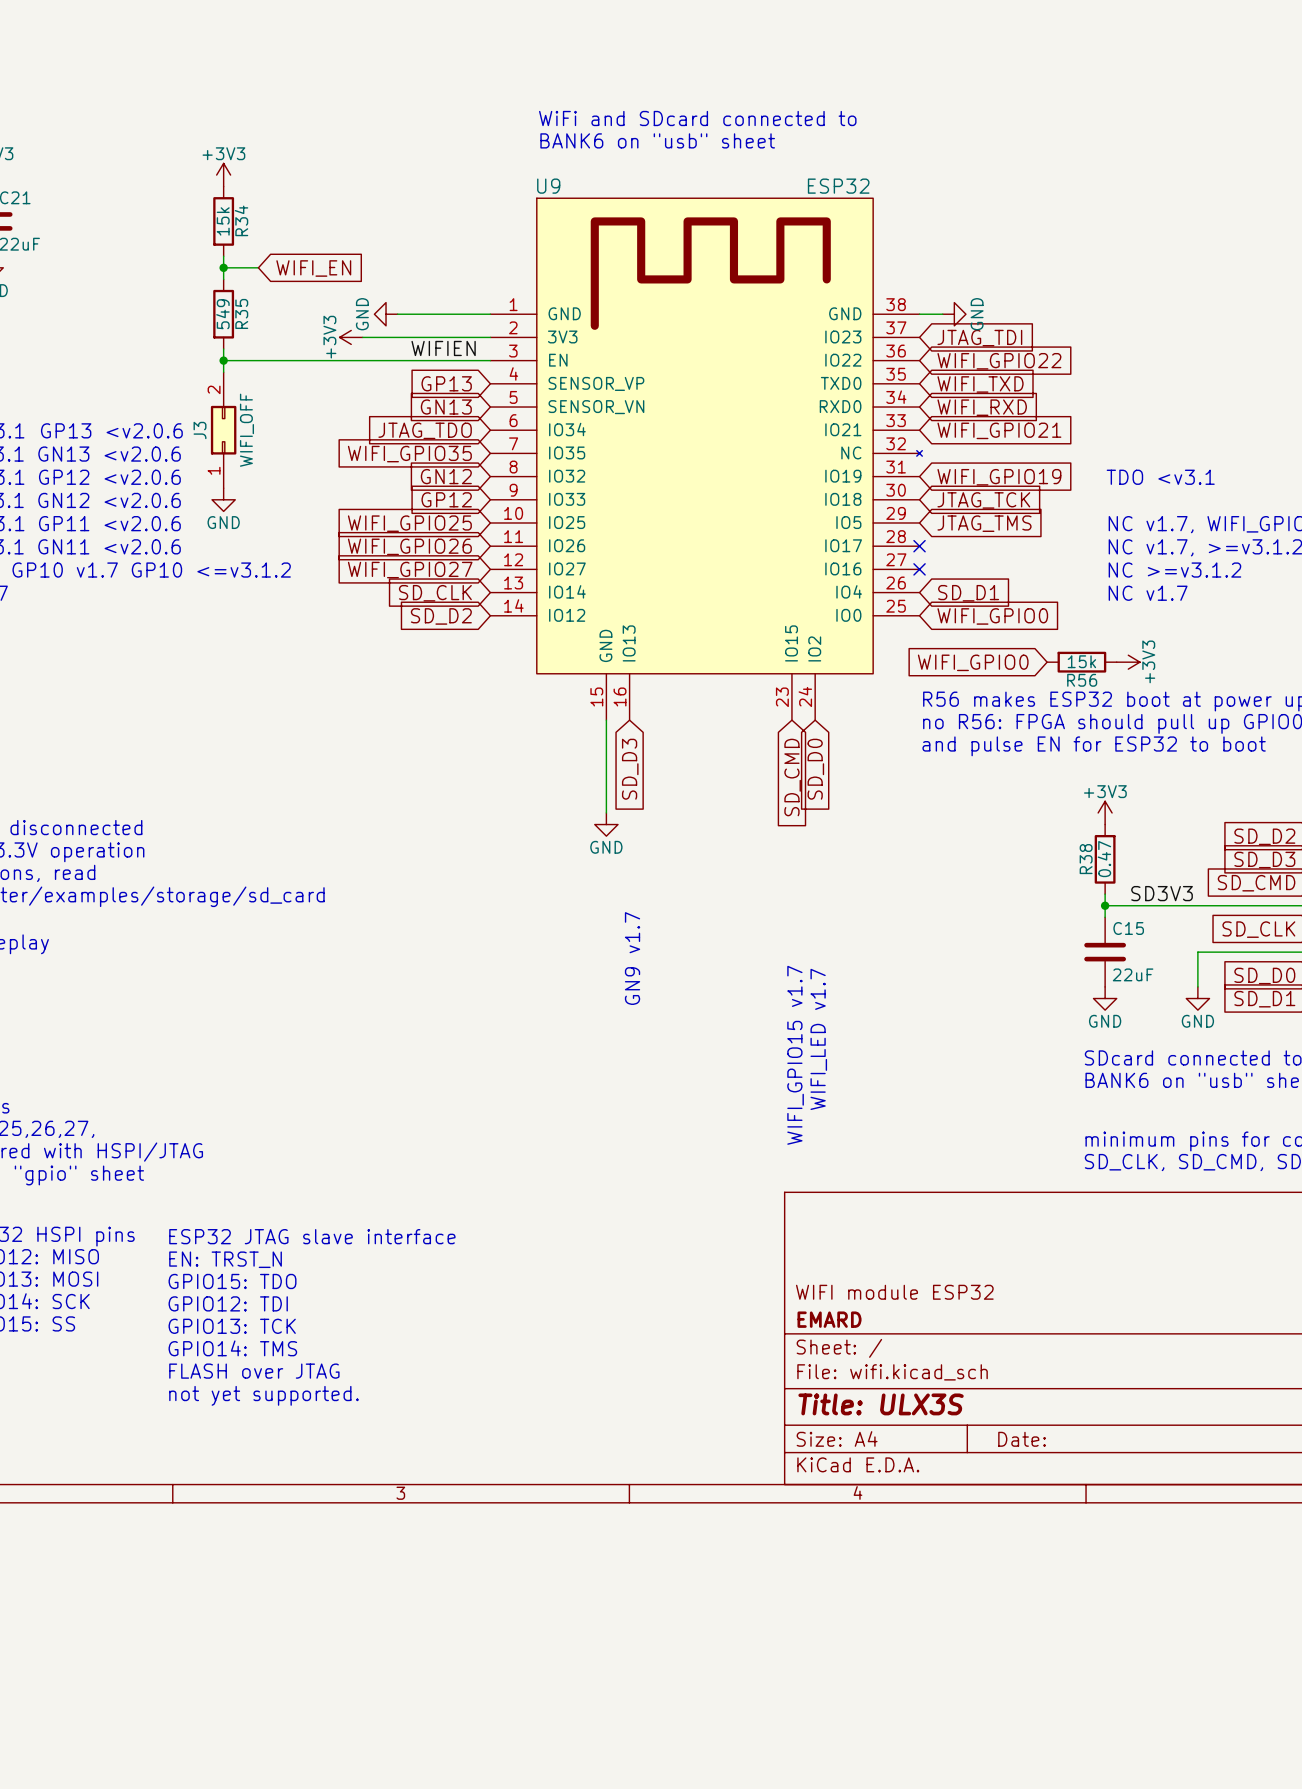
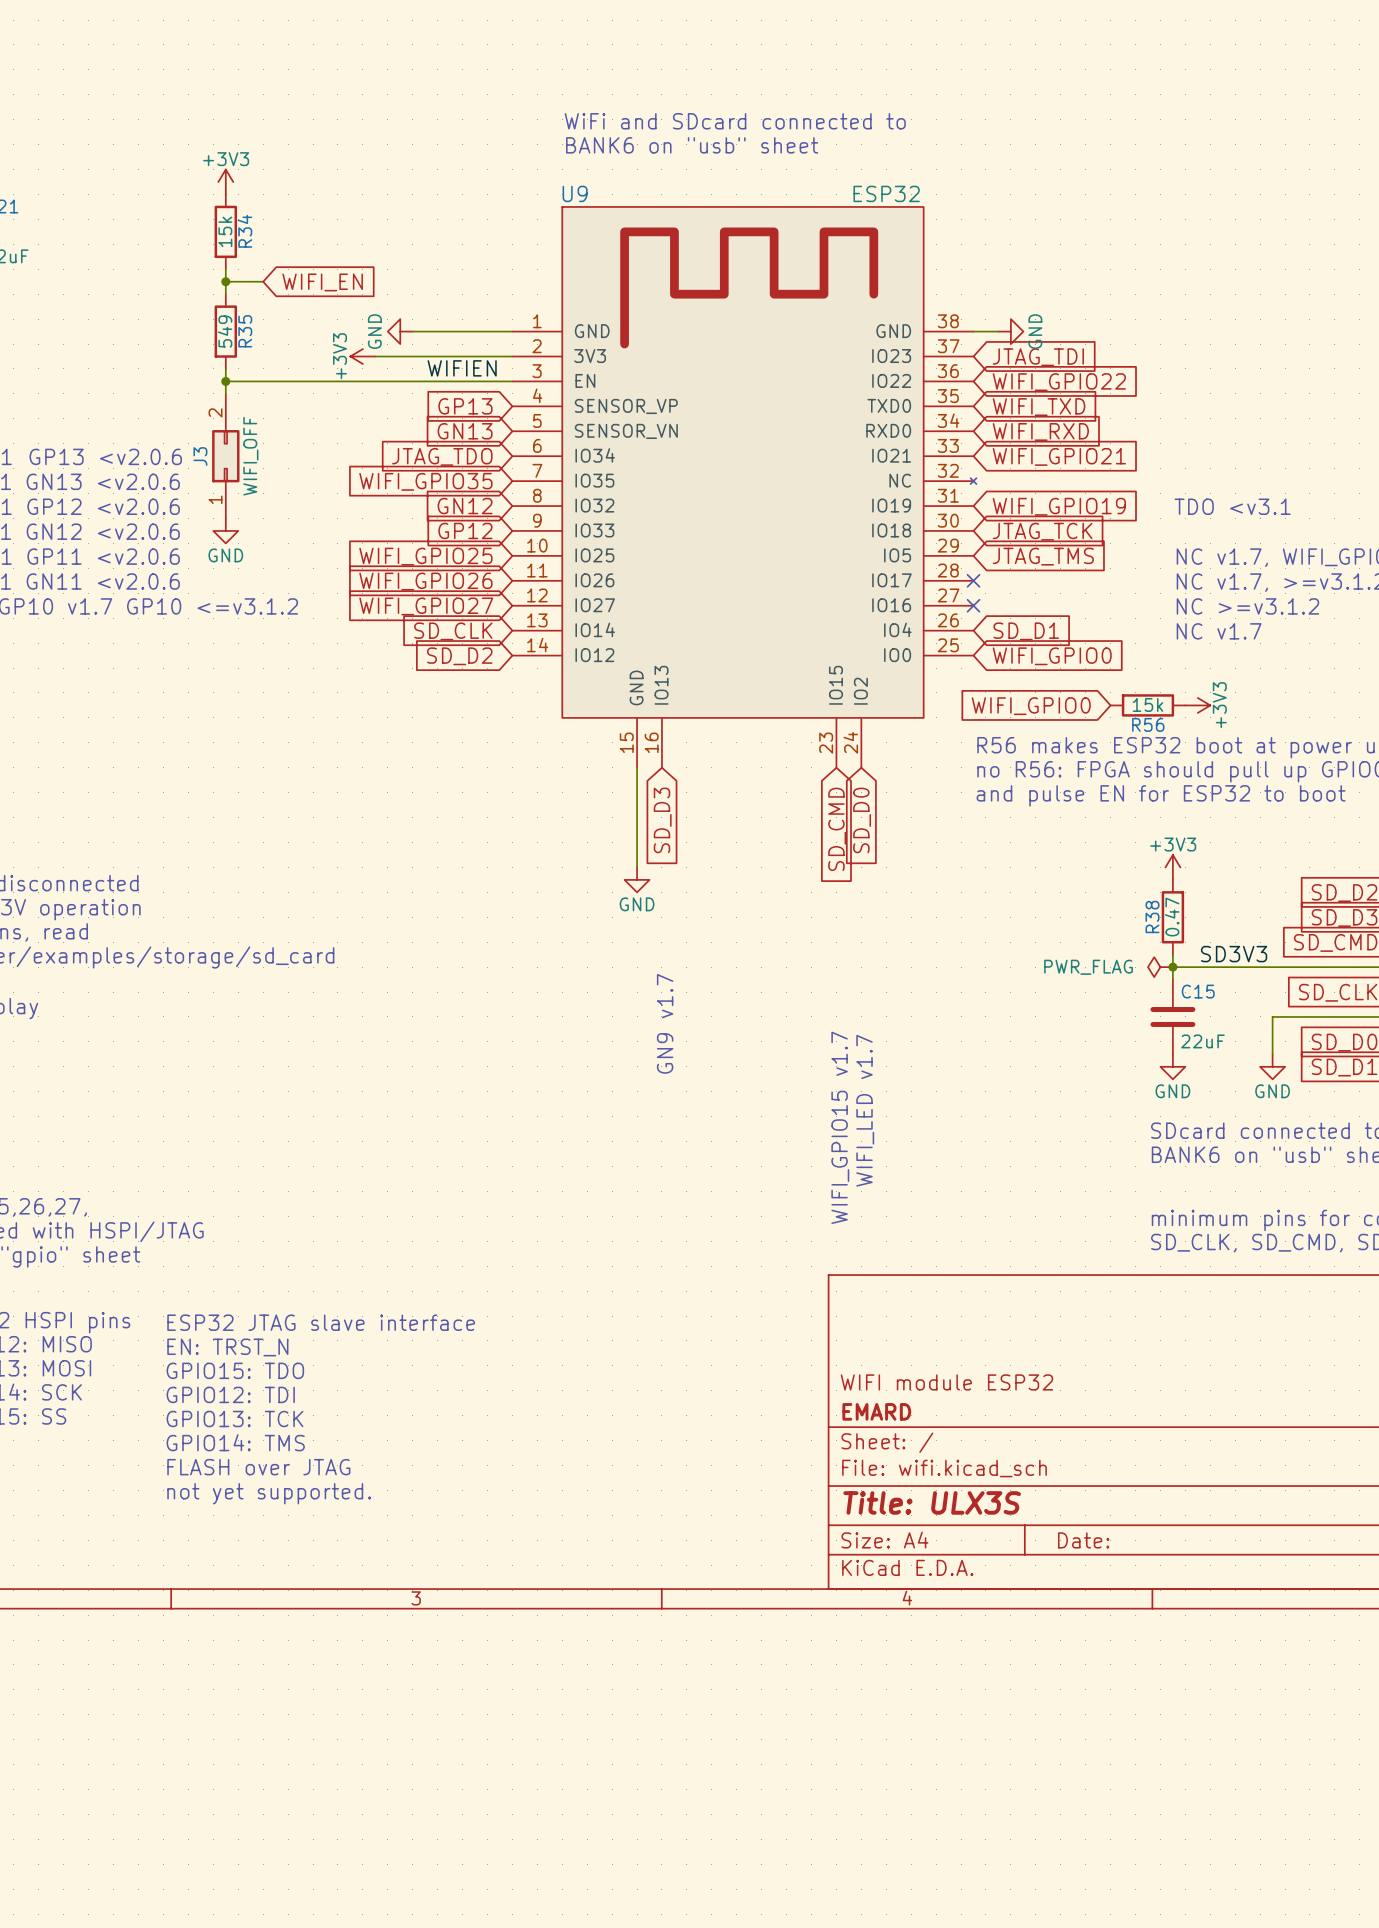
power symbol: none -> PWR_FLAG (1160, 967)

